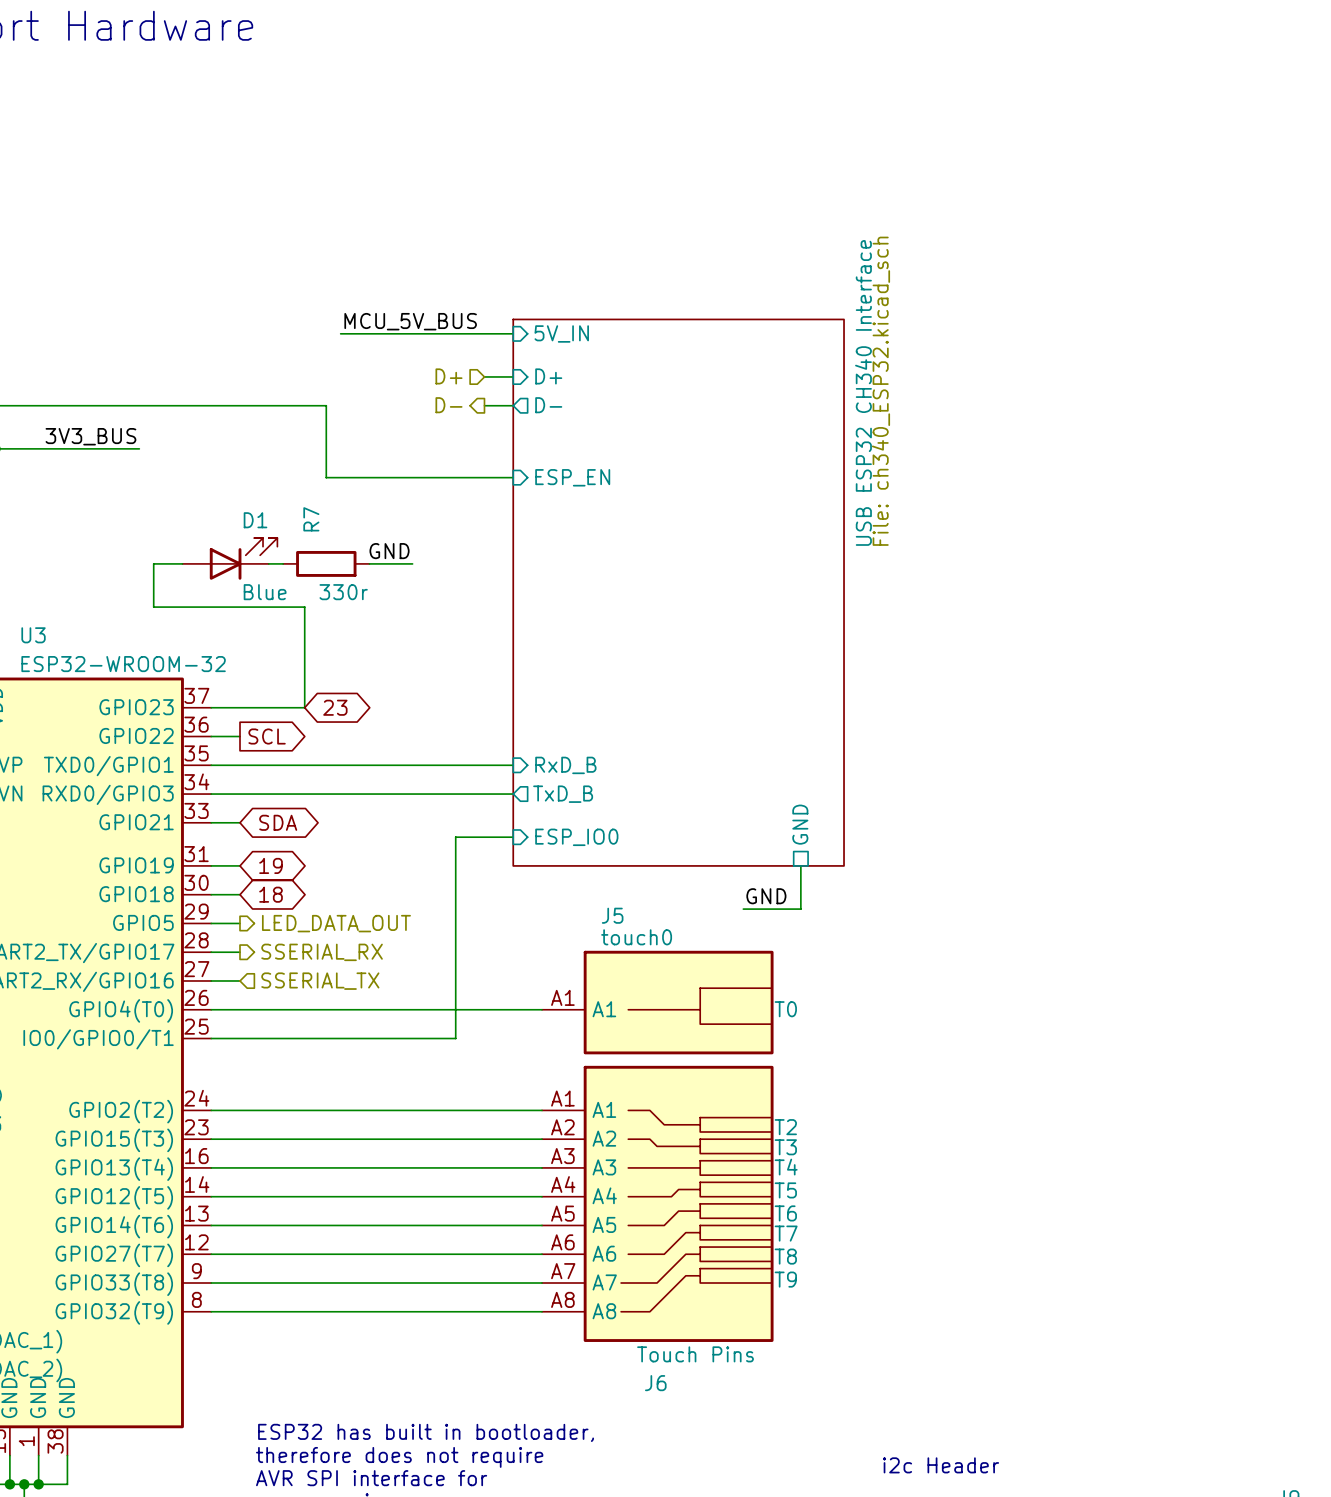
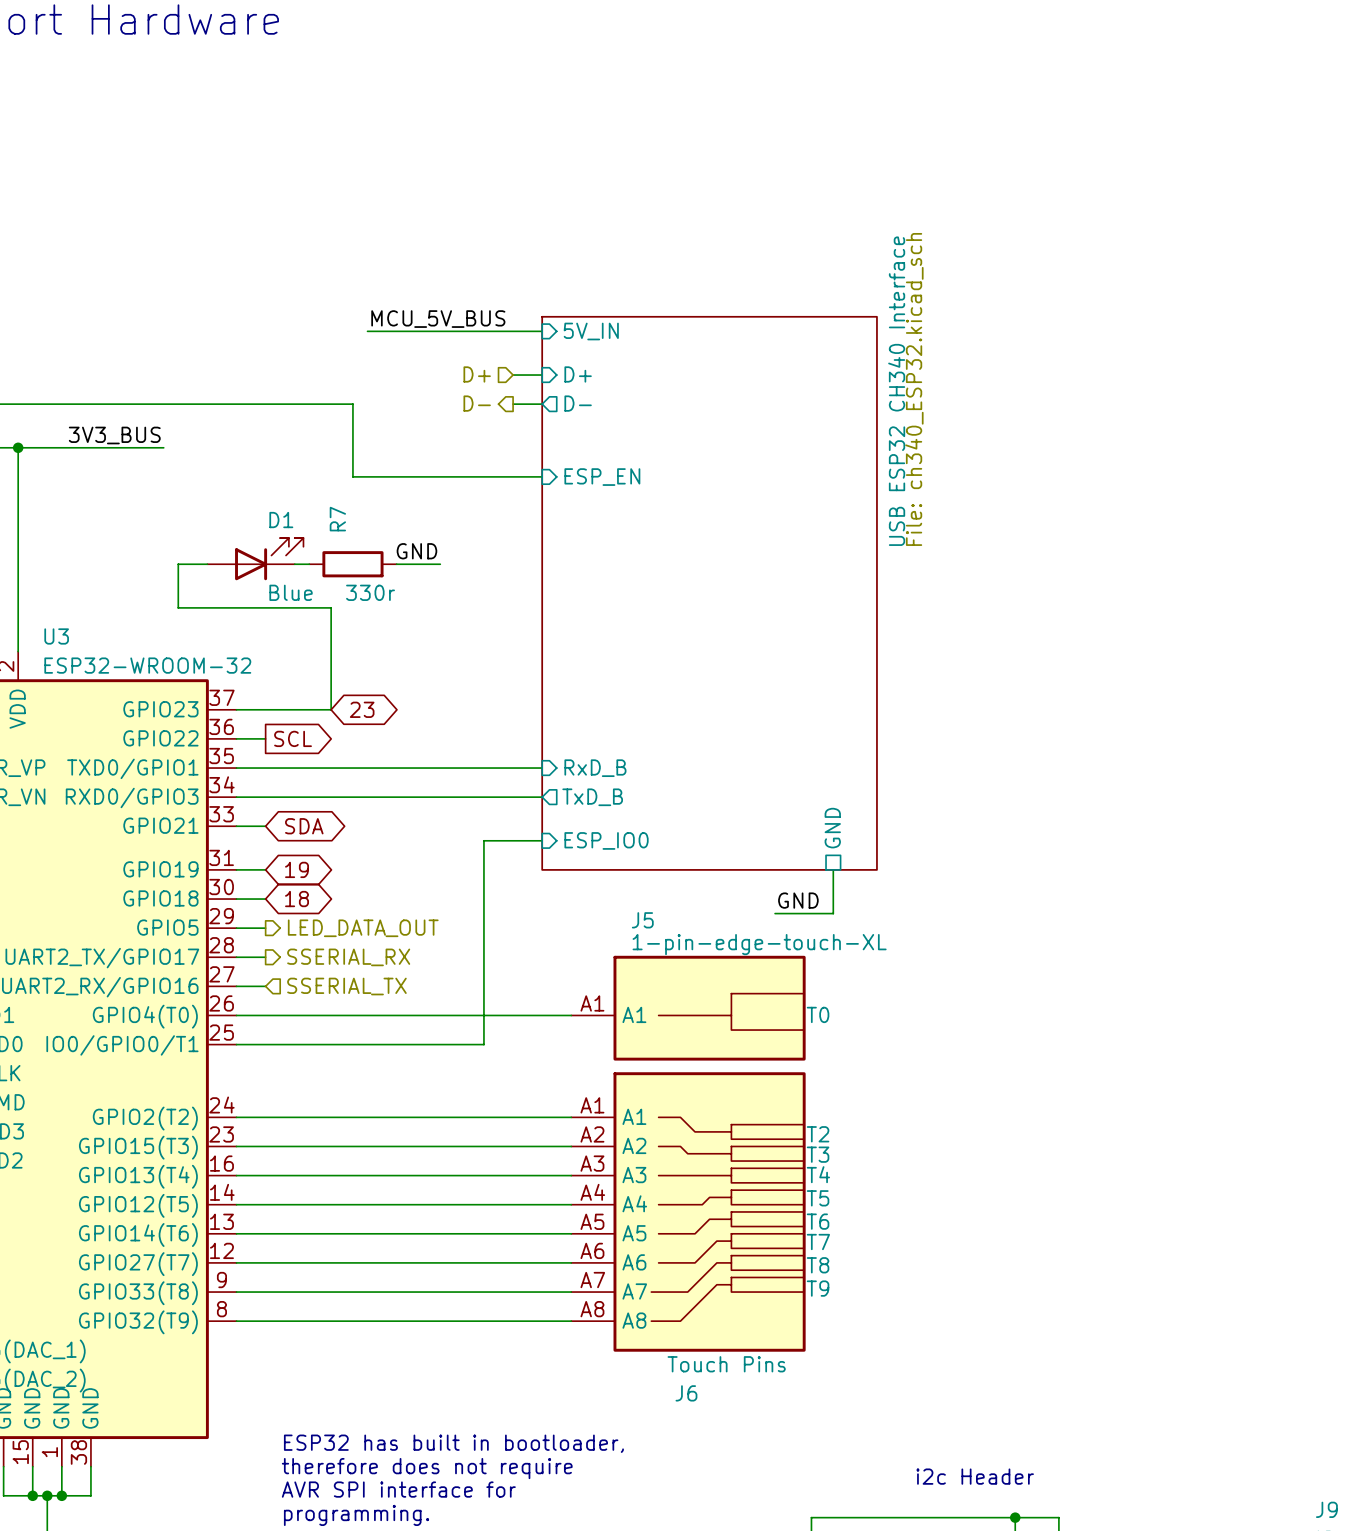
J5 value: touch0 (636, 937) -> 1-pin-edge-touch-XL (759, 944)

